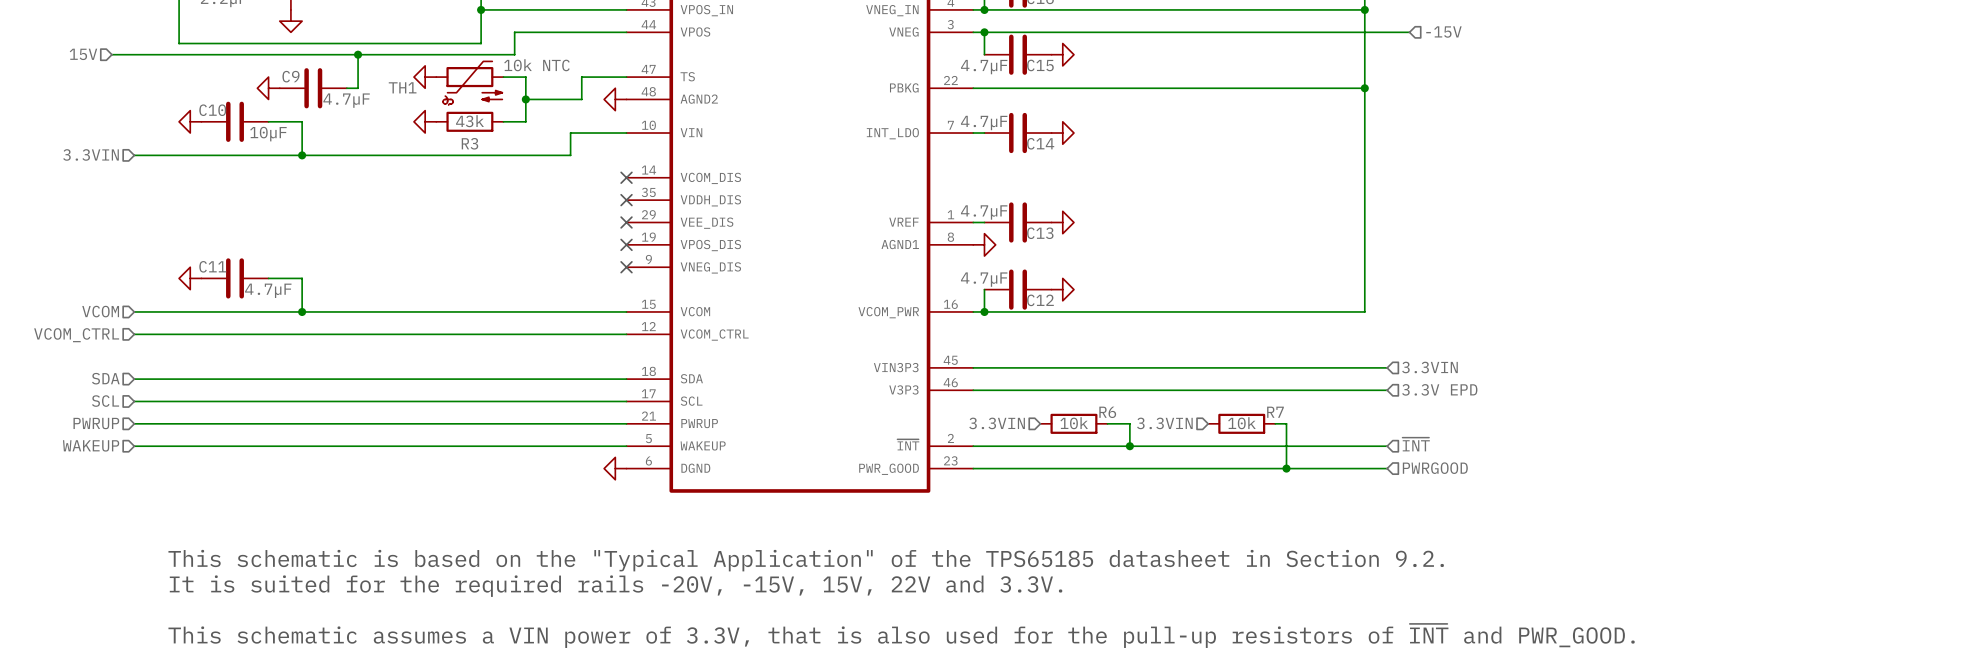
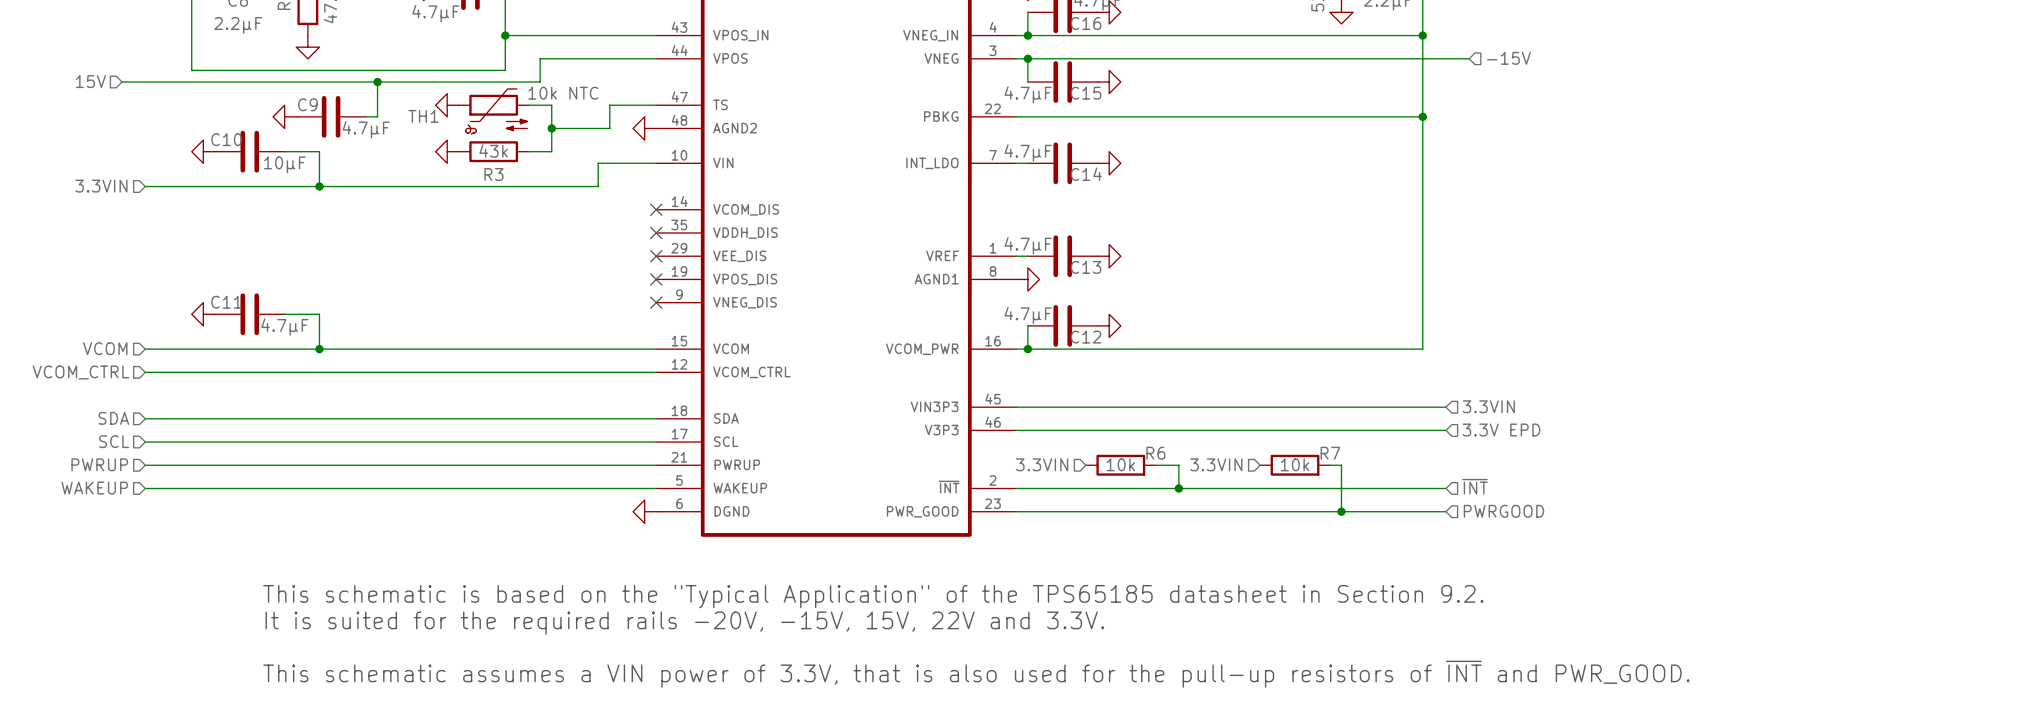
text position: This schematic is based on the "Typical Application" of the TPS65185 datasheet in Section 9.2. (806, 560) -> This schematic is based on the "Typical Application" of the TPS65185 datasheet in Section 9.2. (873, 596)
text position: It is suited for the required rails -20V, -15V, 15V, 22V and 3.3V. (616, 586) -> It is suited for the required rails -20V, -15V, 15V, 22V and 3.3V. (684, 623)
text position: This schematic assumes a VIN power of 3.3V, that is also used for the pull-up resistors of ~{INT} and PWR_GOOD. (901, 635) -> This schematic assumes a VIN power of 3.3V, that is also used for the pull-up resistors of ~{INT} and PWR_GOOD. (976, 674)

